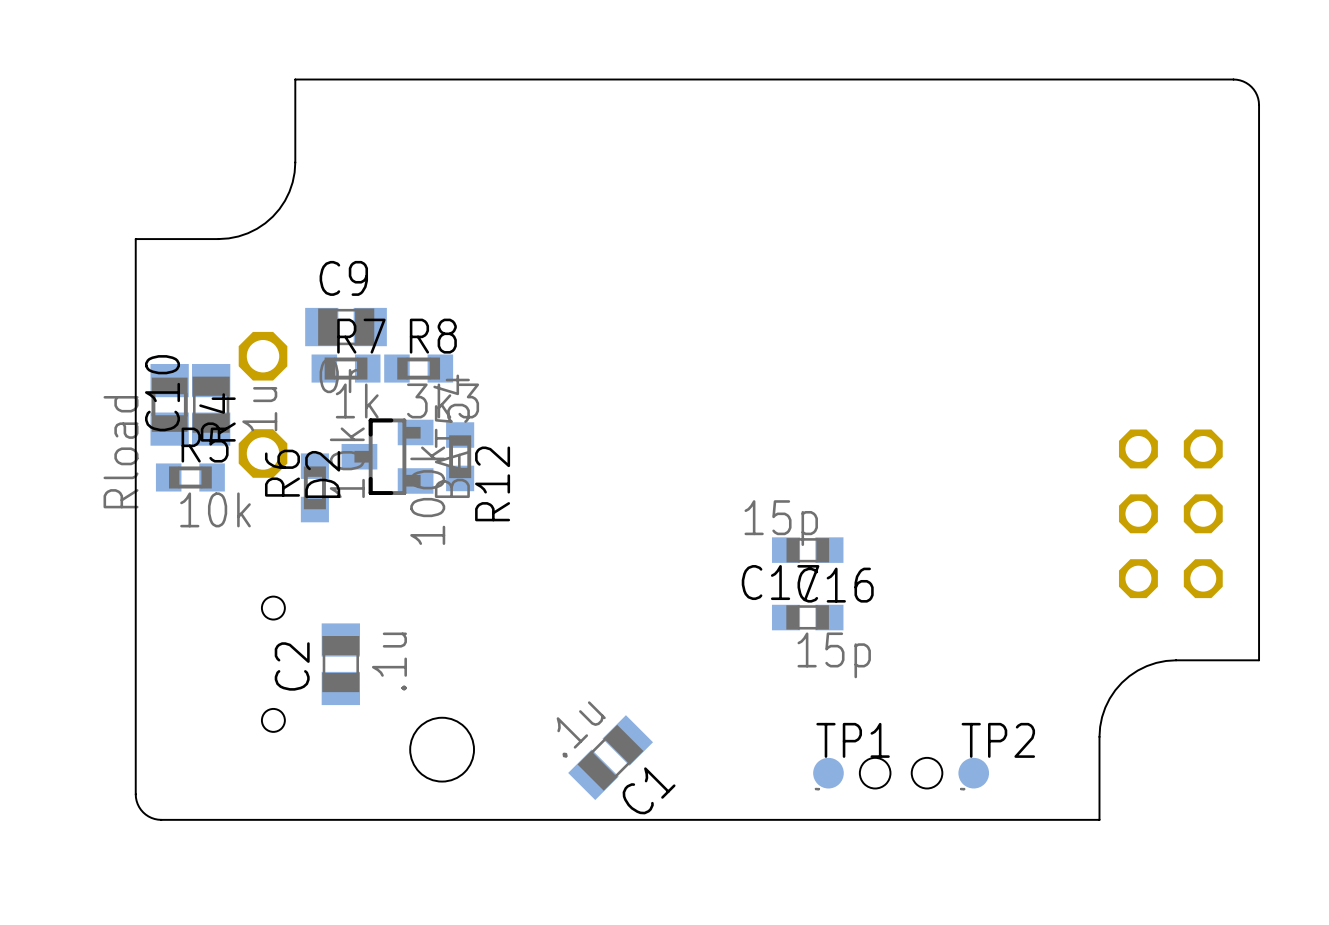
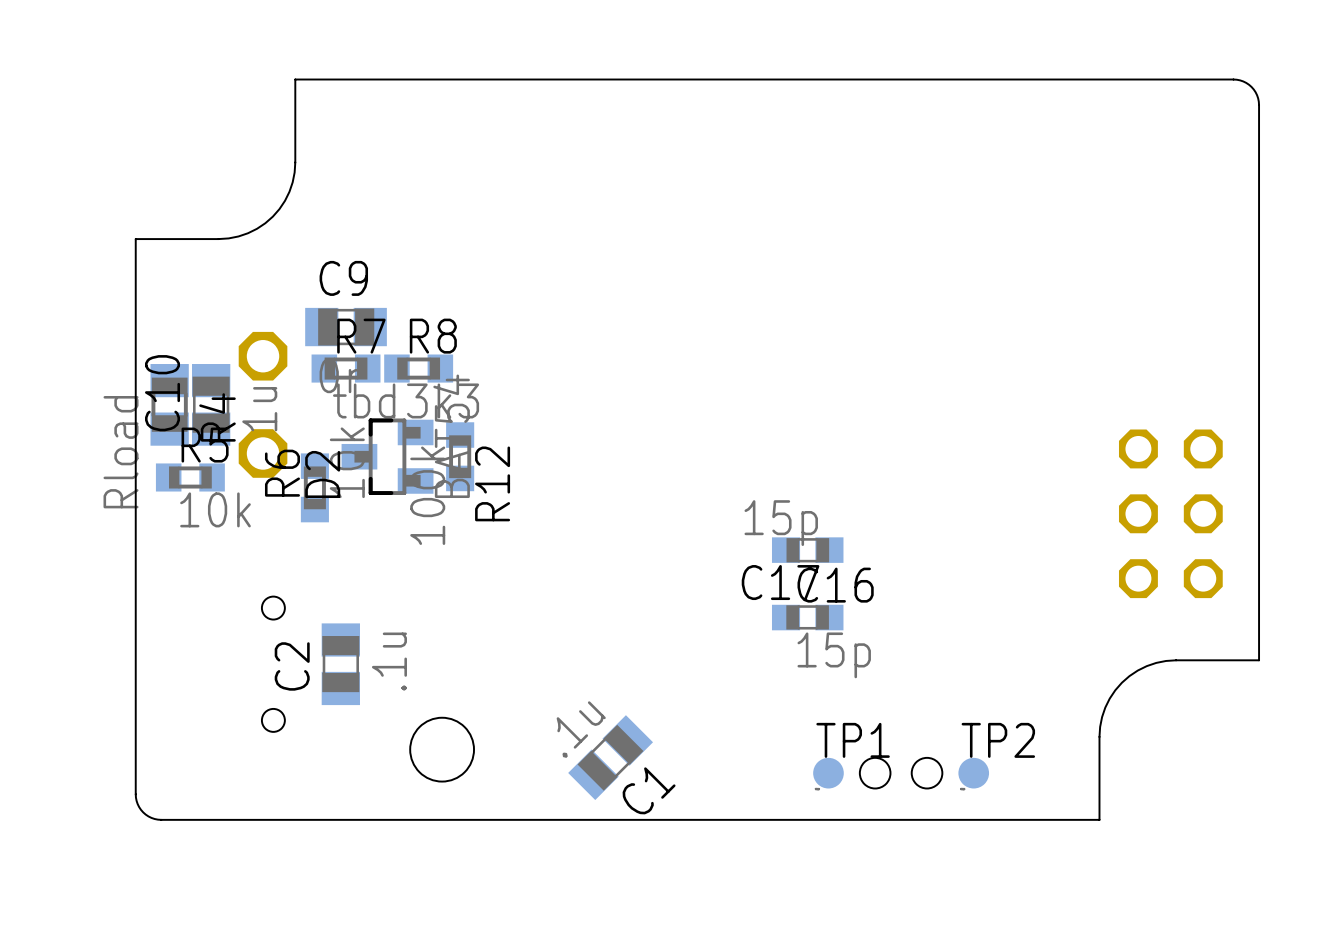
R7 value: 1k (357, 400) -> tbd (364, 400)

